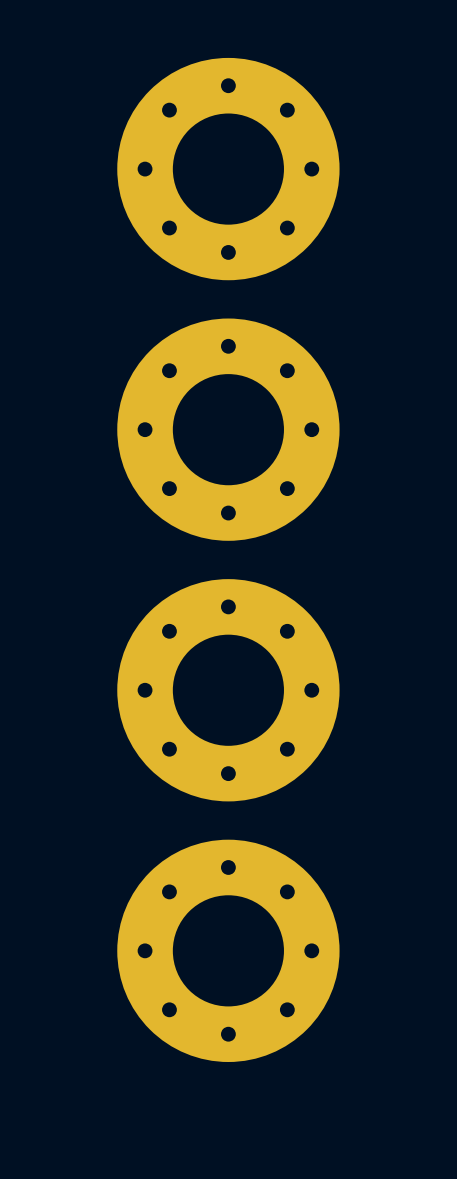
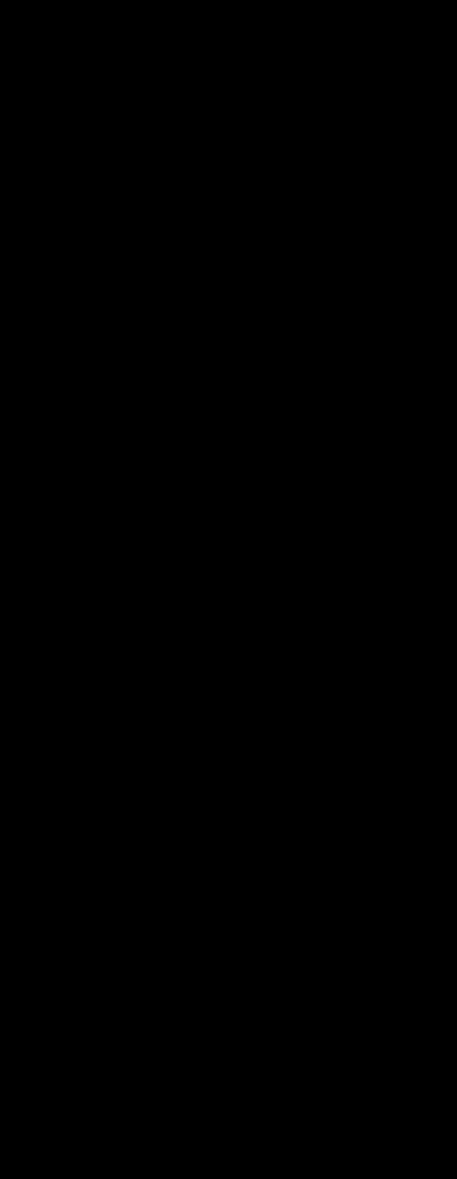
part: (228, 169) -> none
part: (228, 429) -> none
part: (228, 690) -> none
part: (228, 950) -> none

